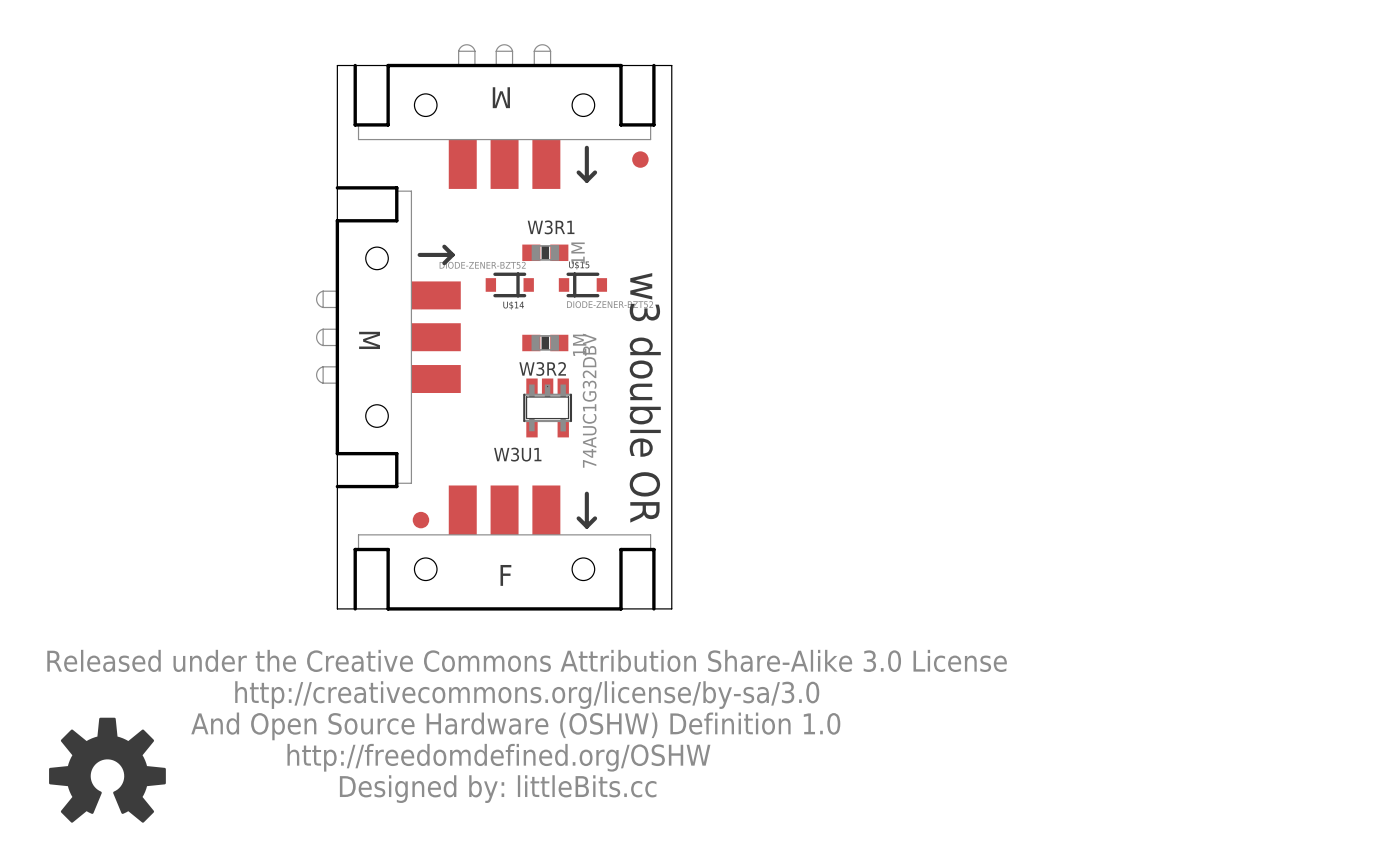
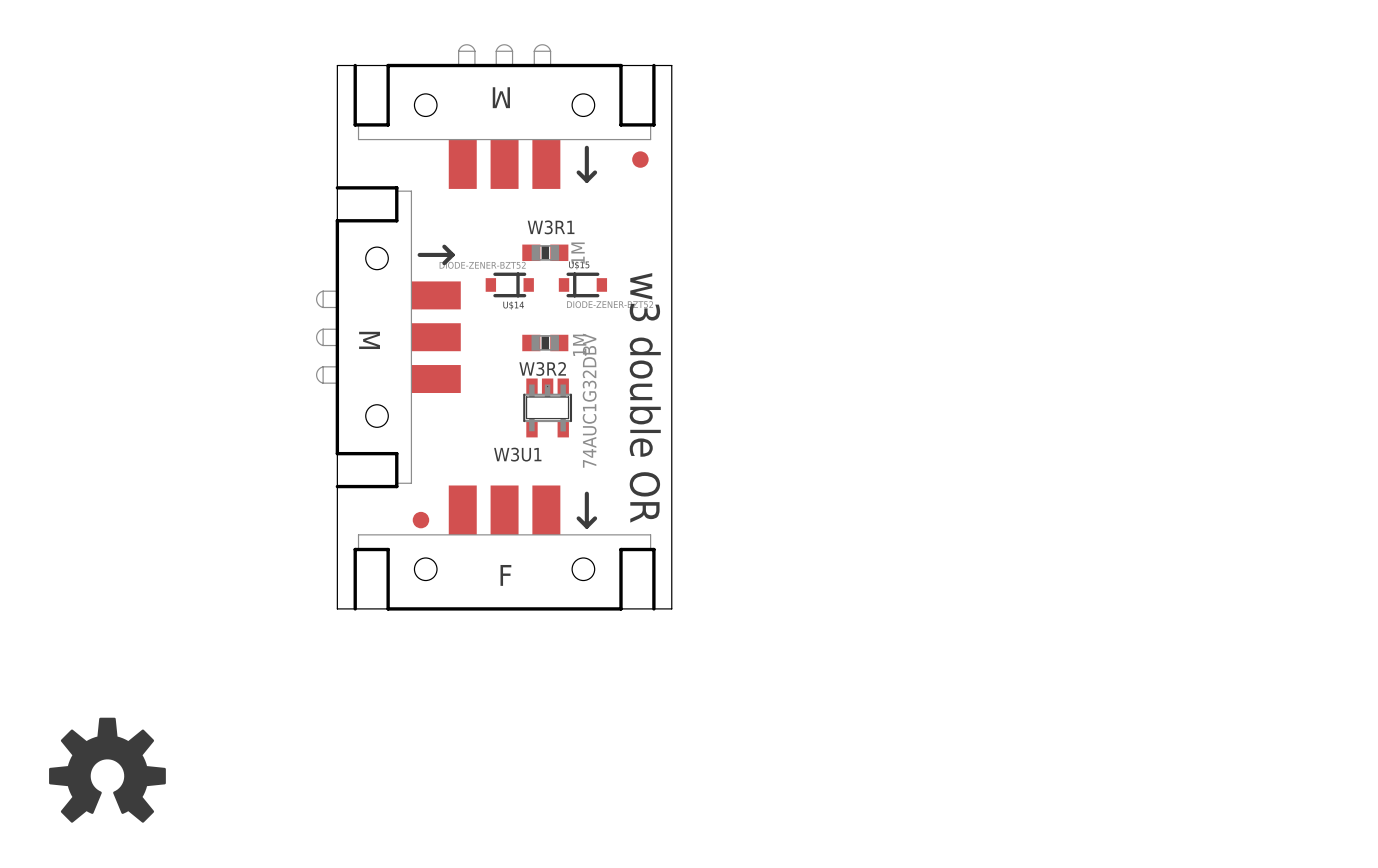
drawing: [47, 649, 1007, 803] -> none

